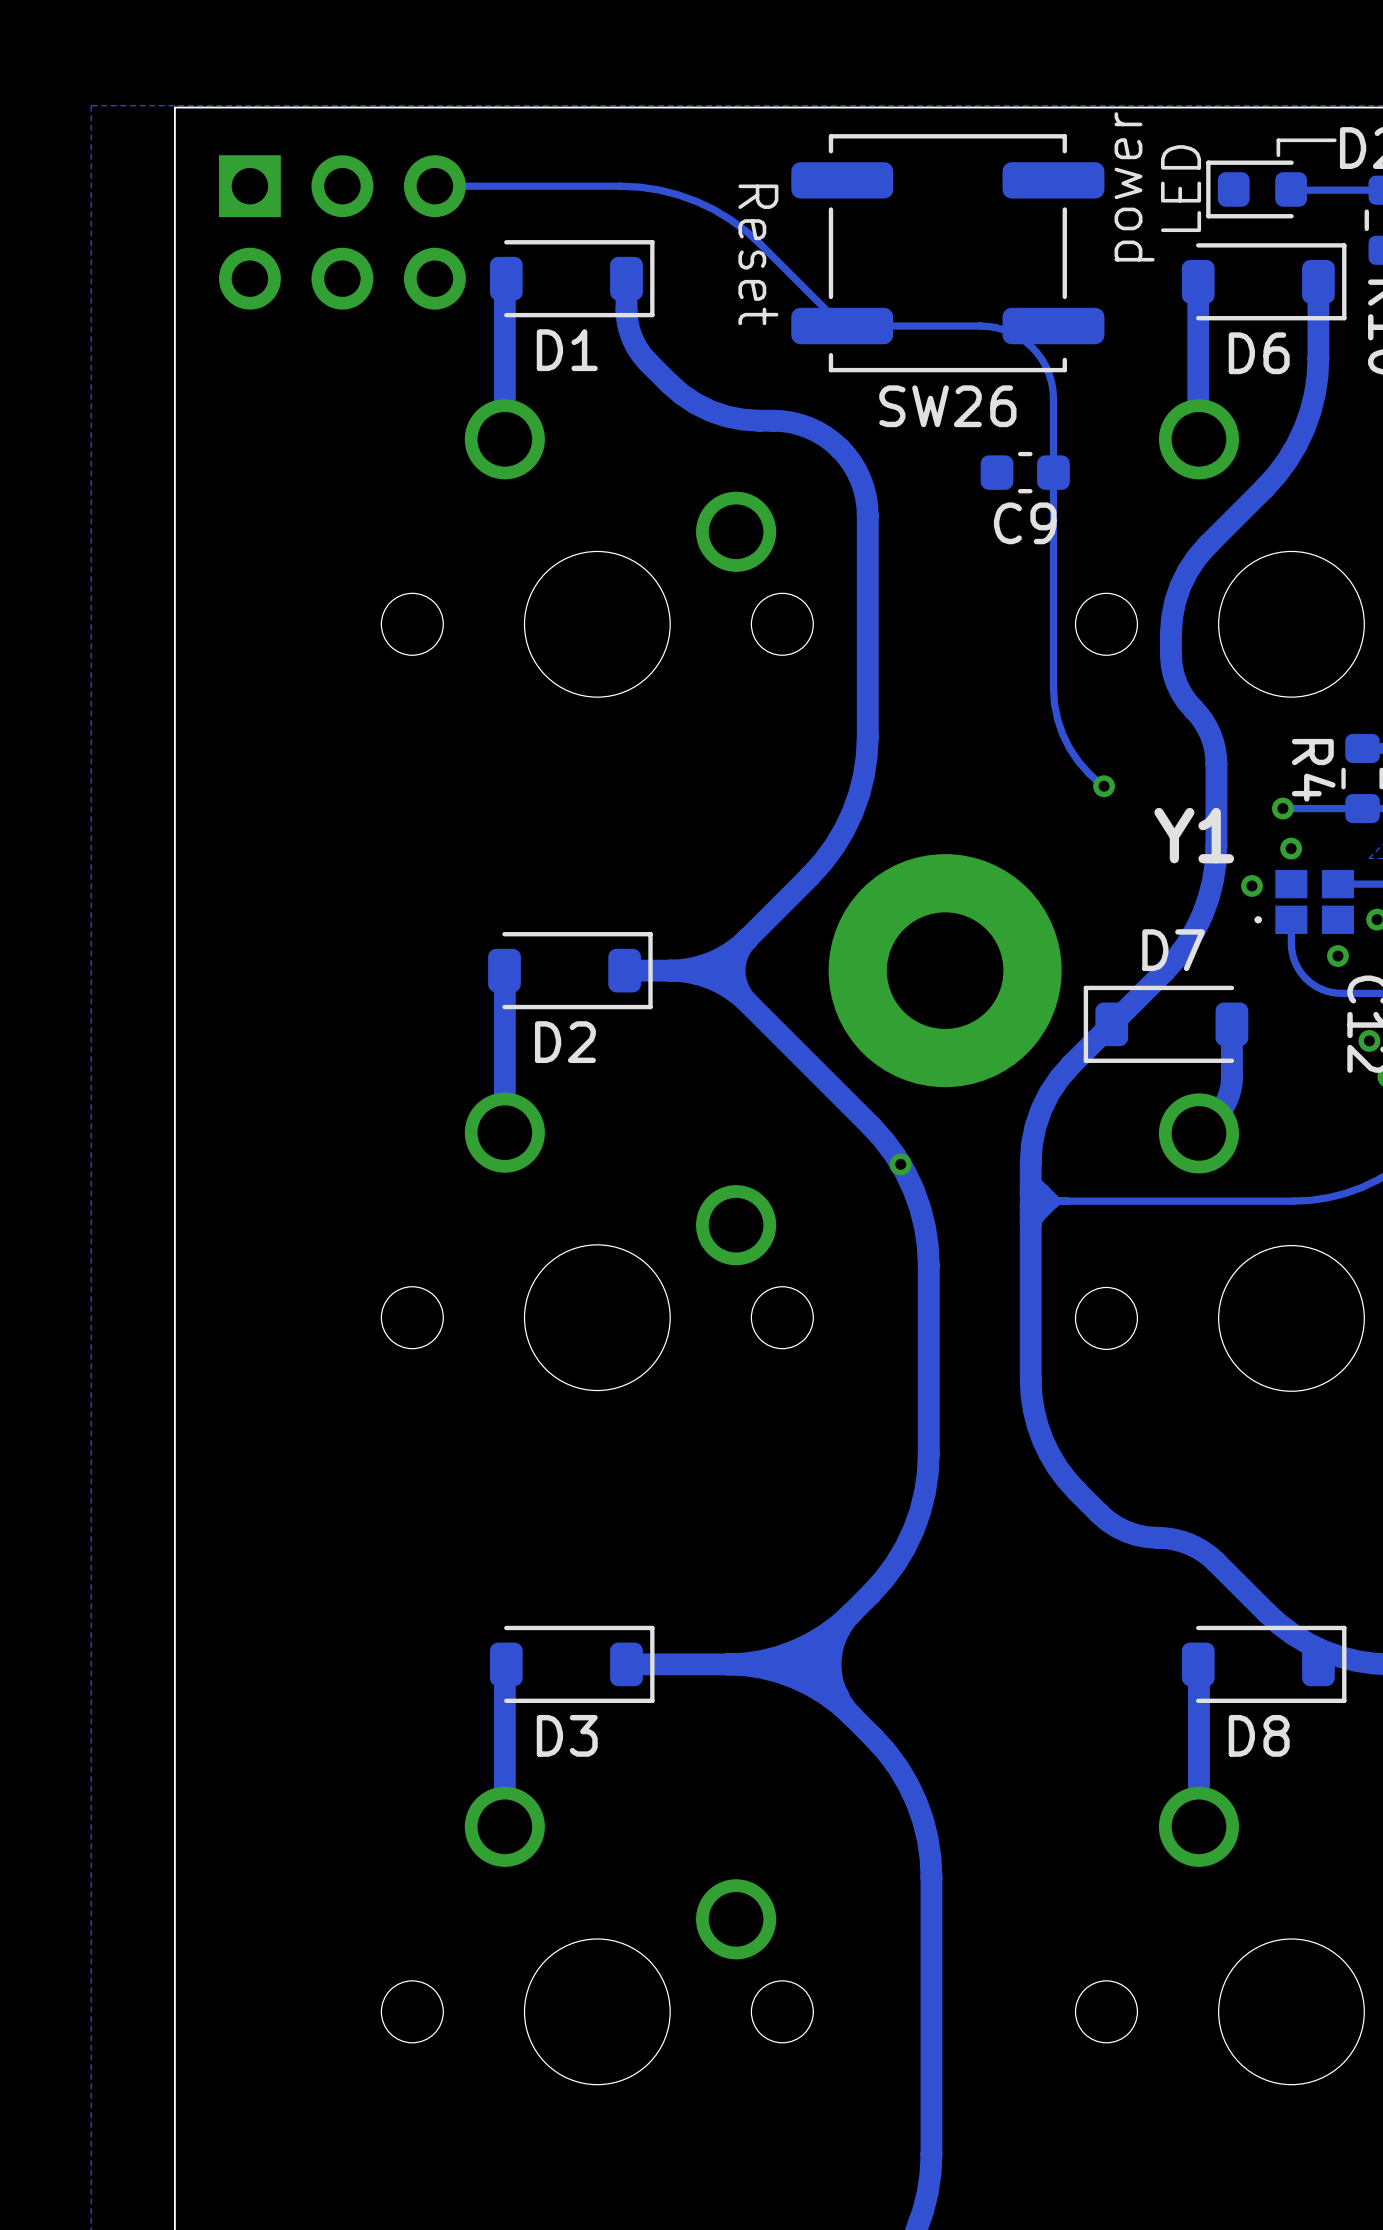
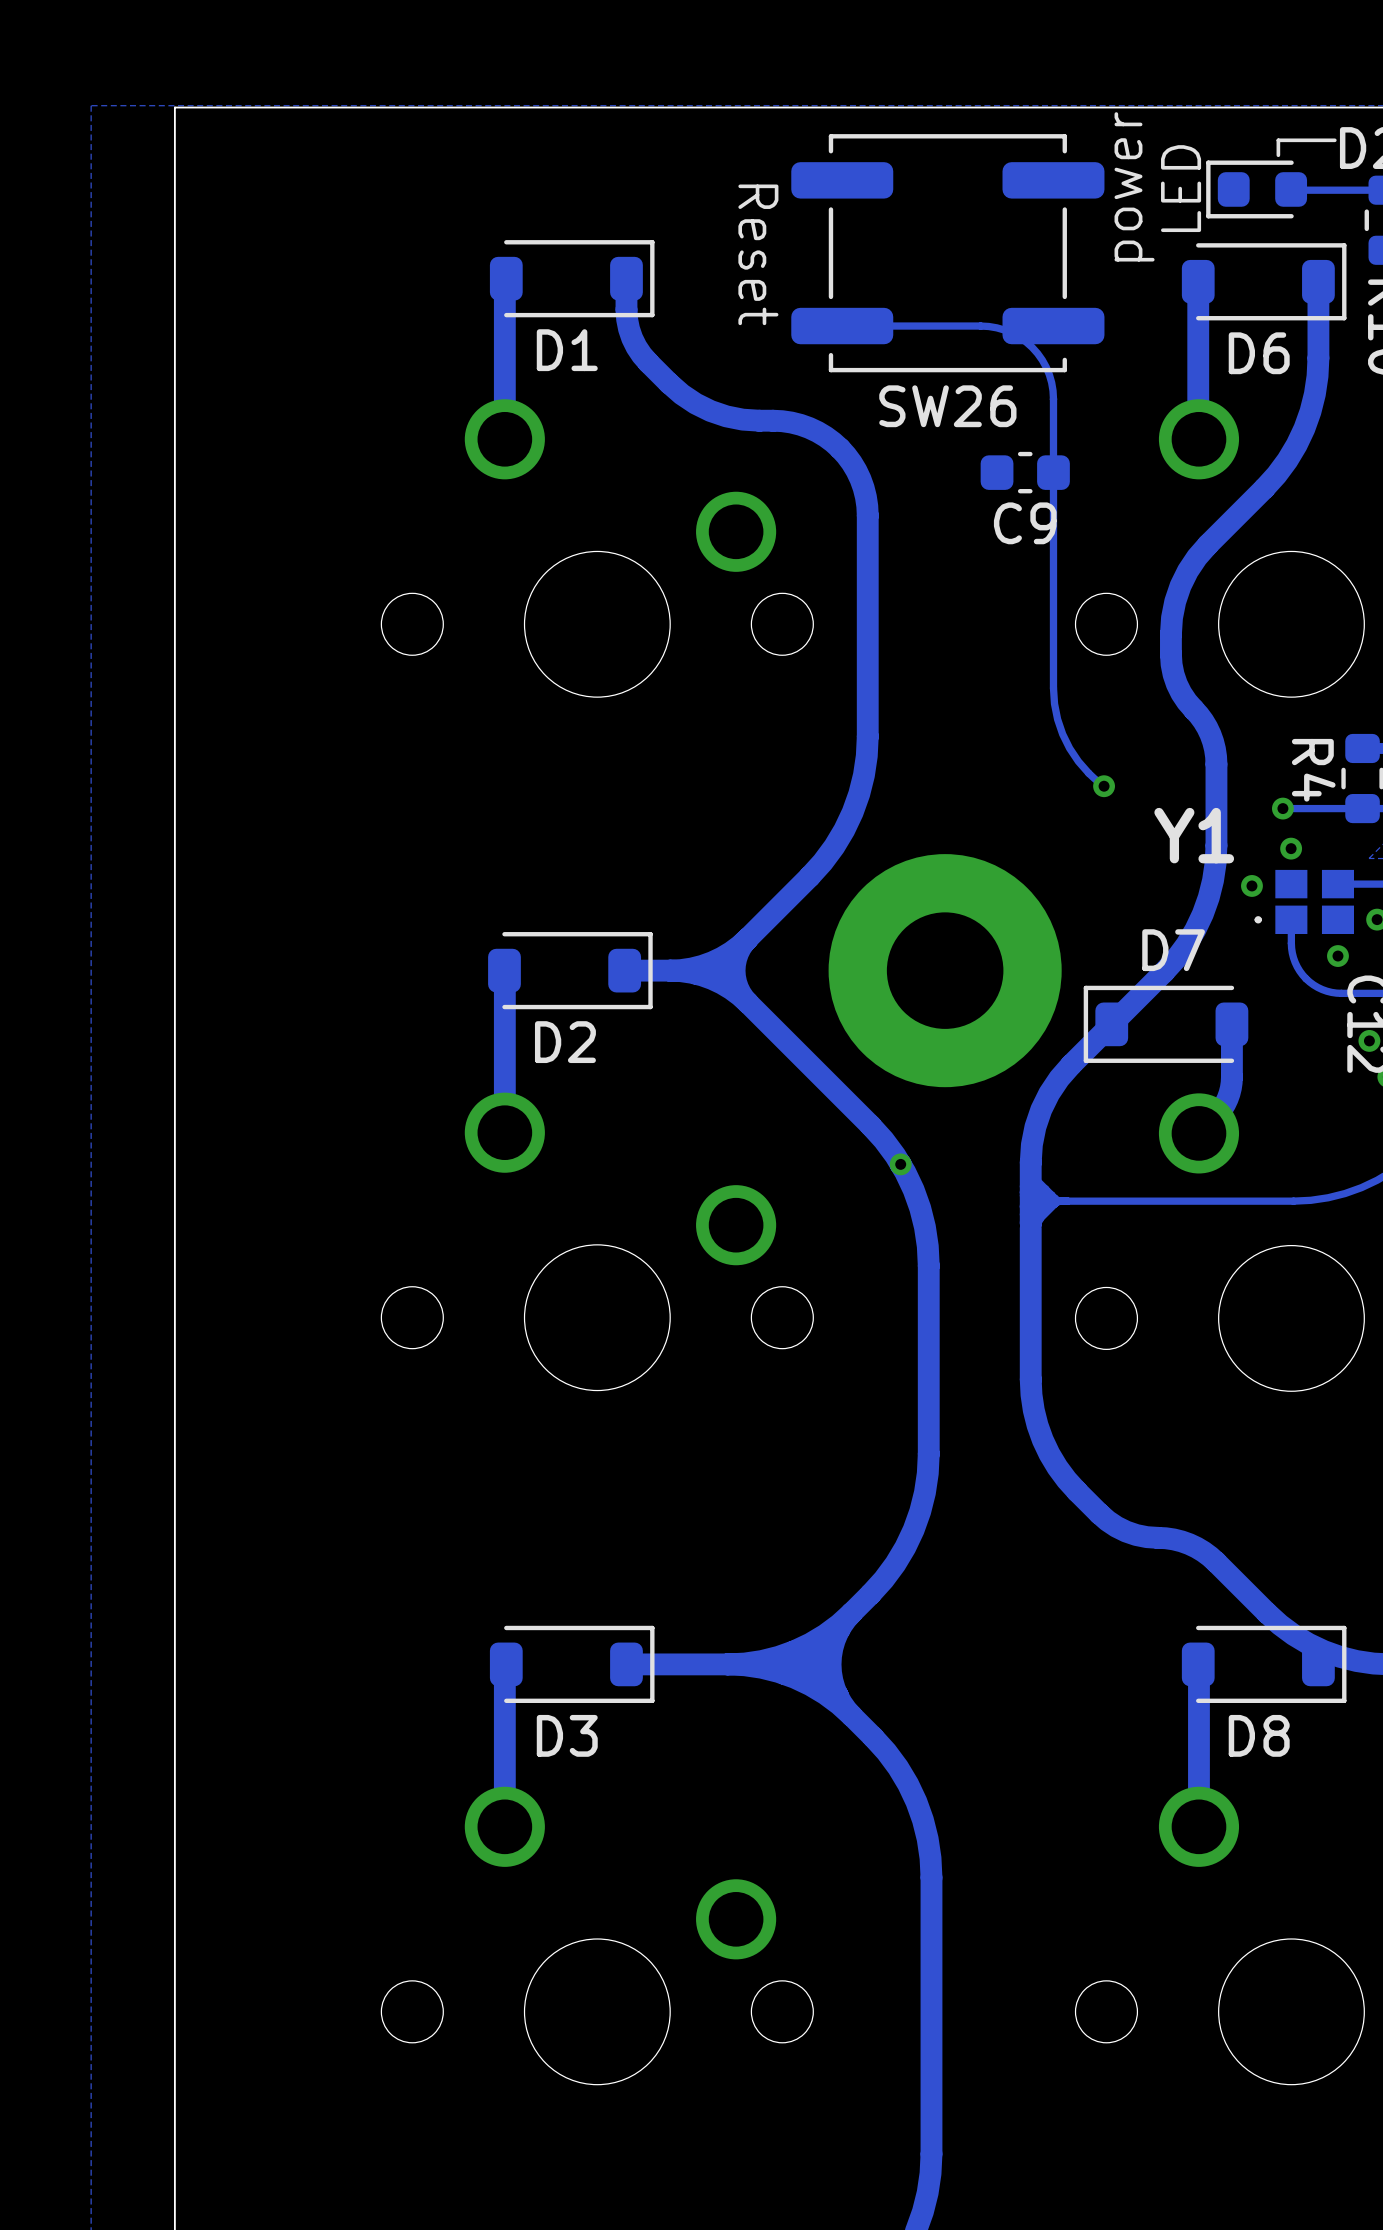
track: (434, 186) (620, 186) (658, 189) (677, 194) (713, 209) (746, 231) (842, 326) -> none
part: (342, 232) -> none

